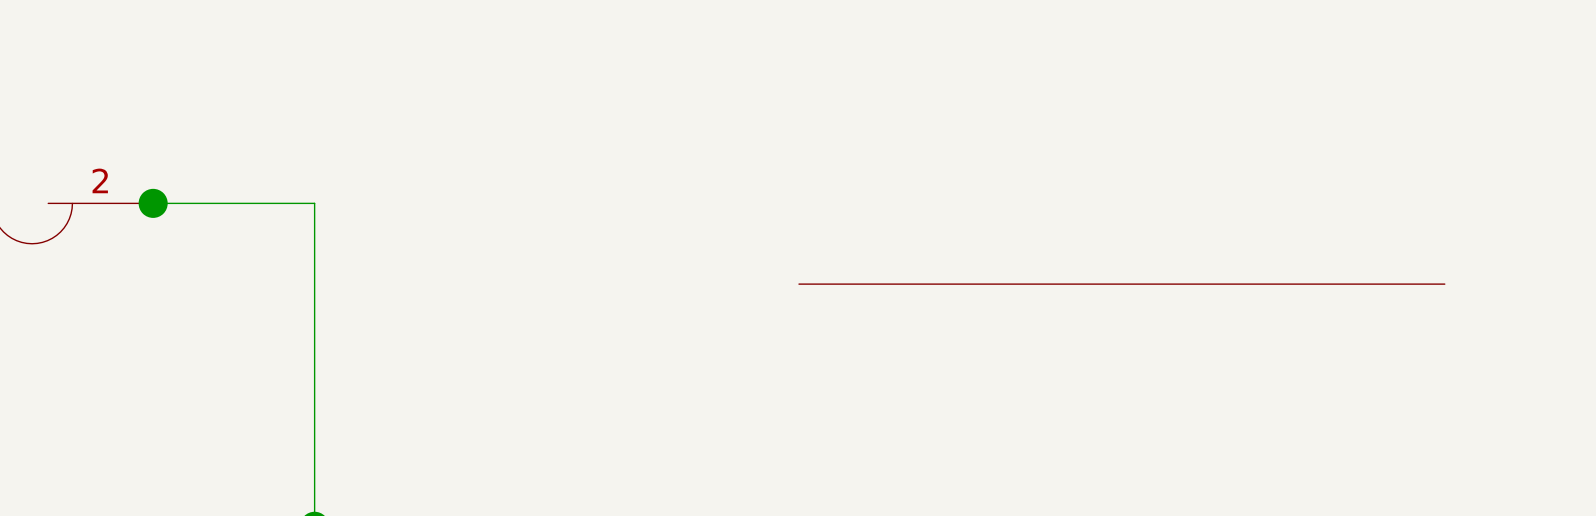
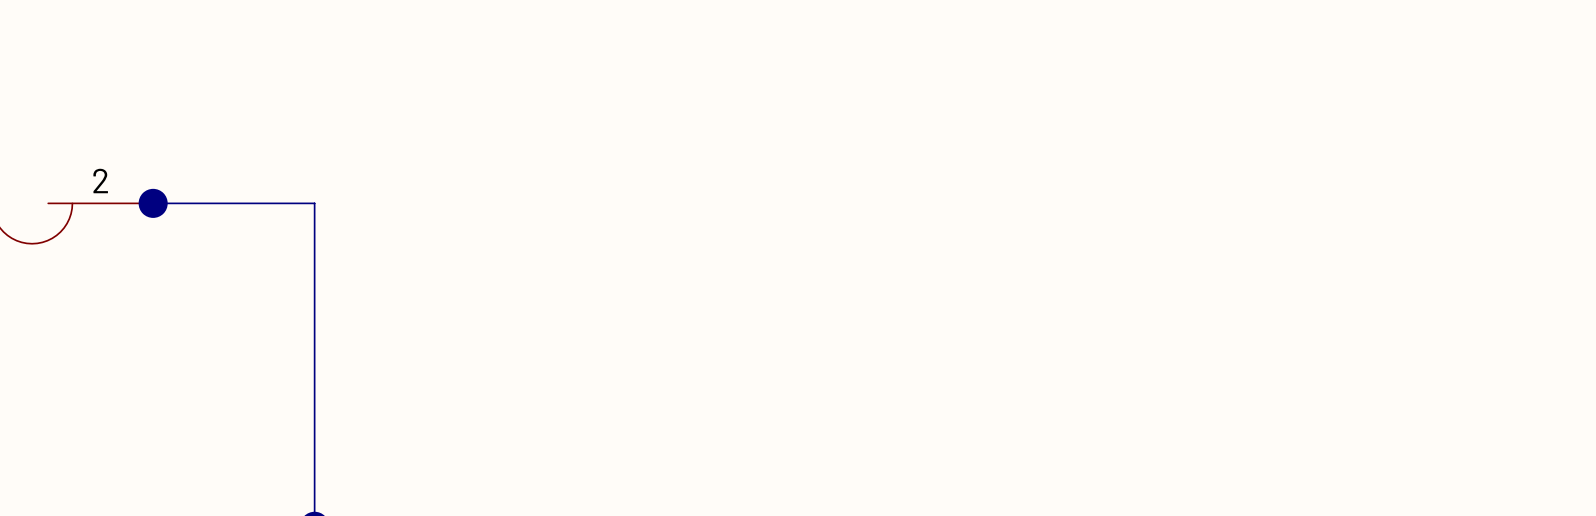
part: (1121, 284) -> none

